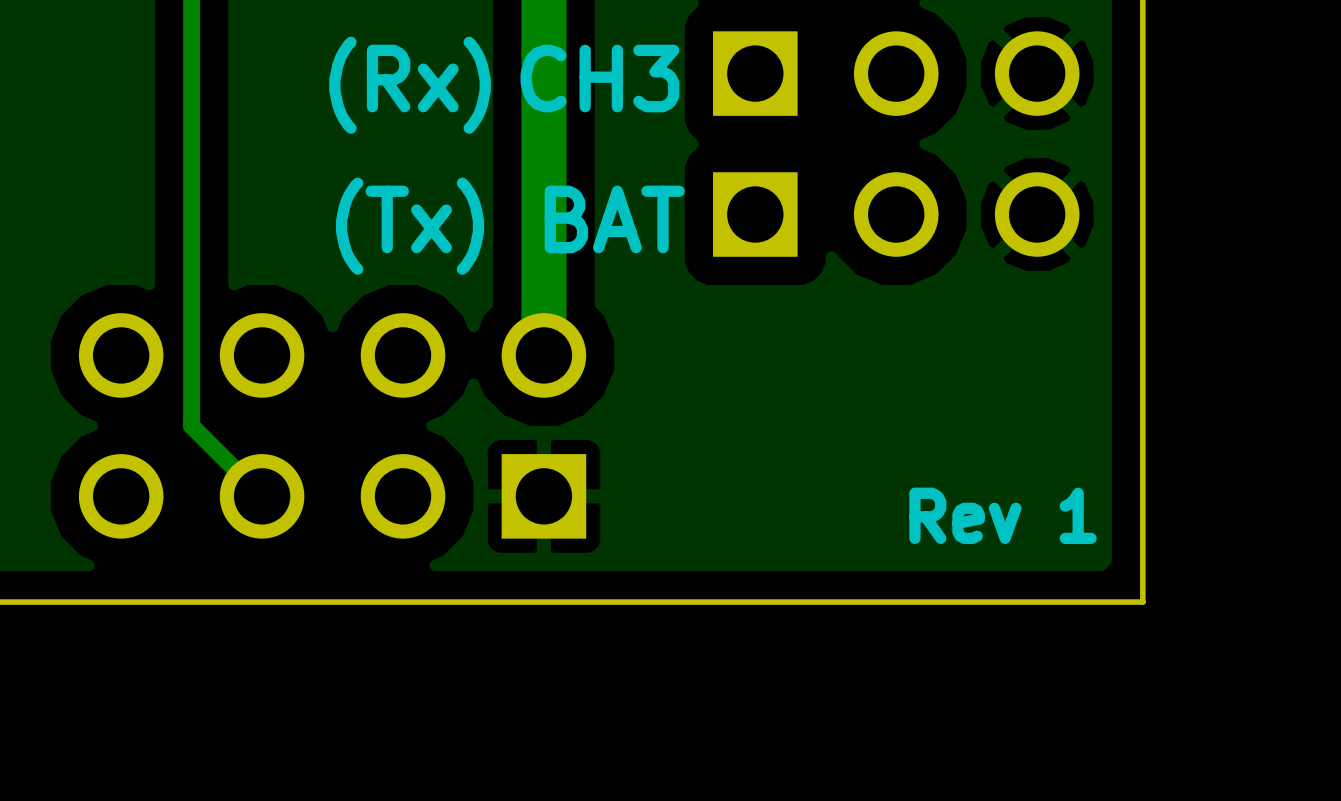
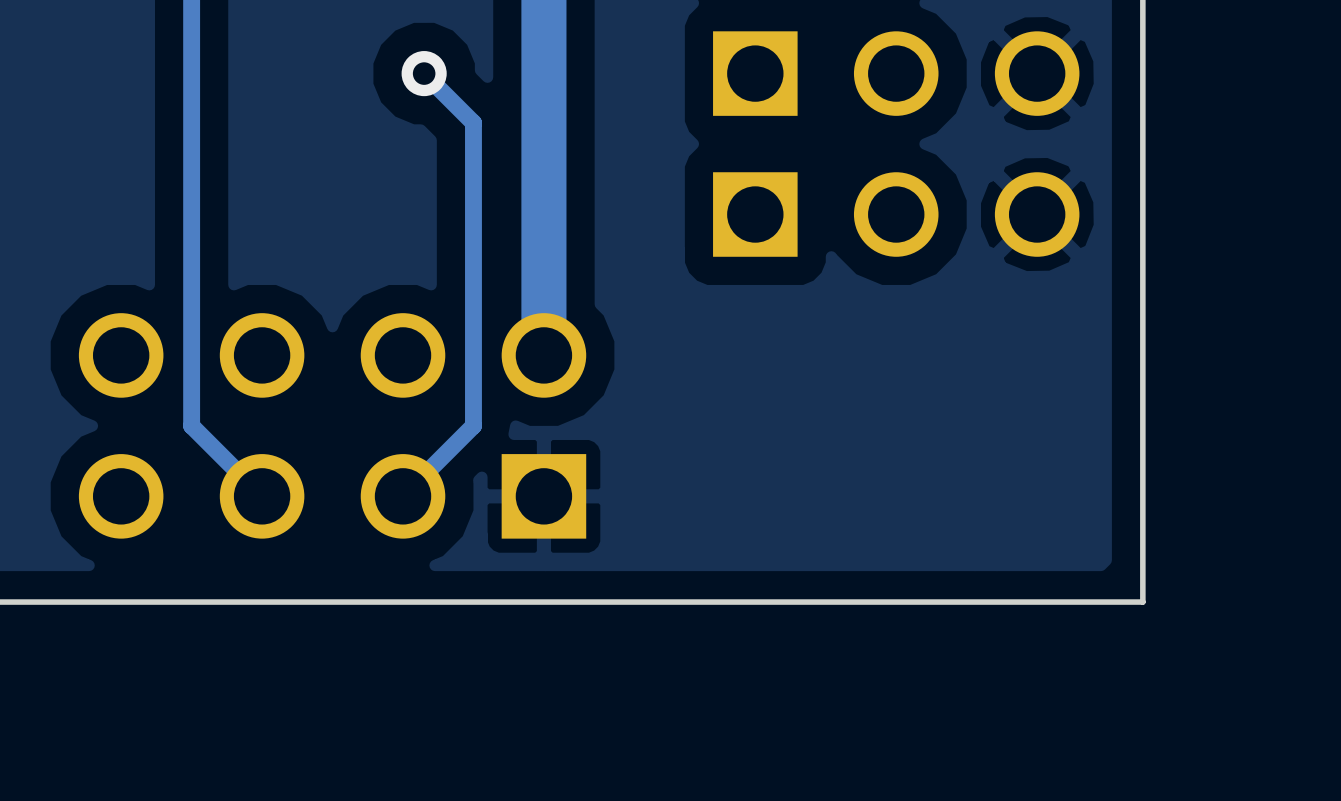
track: none -> (424, 73) (473, 122) (473, 425) (403, 496)
via: none -> (424, 73)
text: CH3 (599, 78) -> none
text: (Rx) (410, 85) -> none
text: BAT (614, 219) -> none
text: (Tx) (410, 226) -> none
text: Rev 1 (1003, 515) -> none

